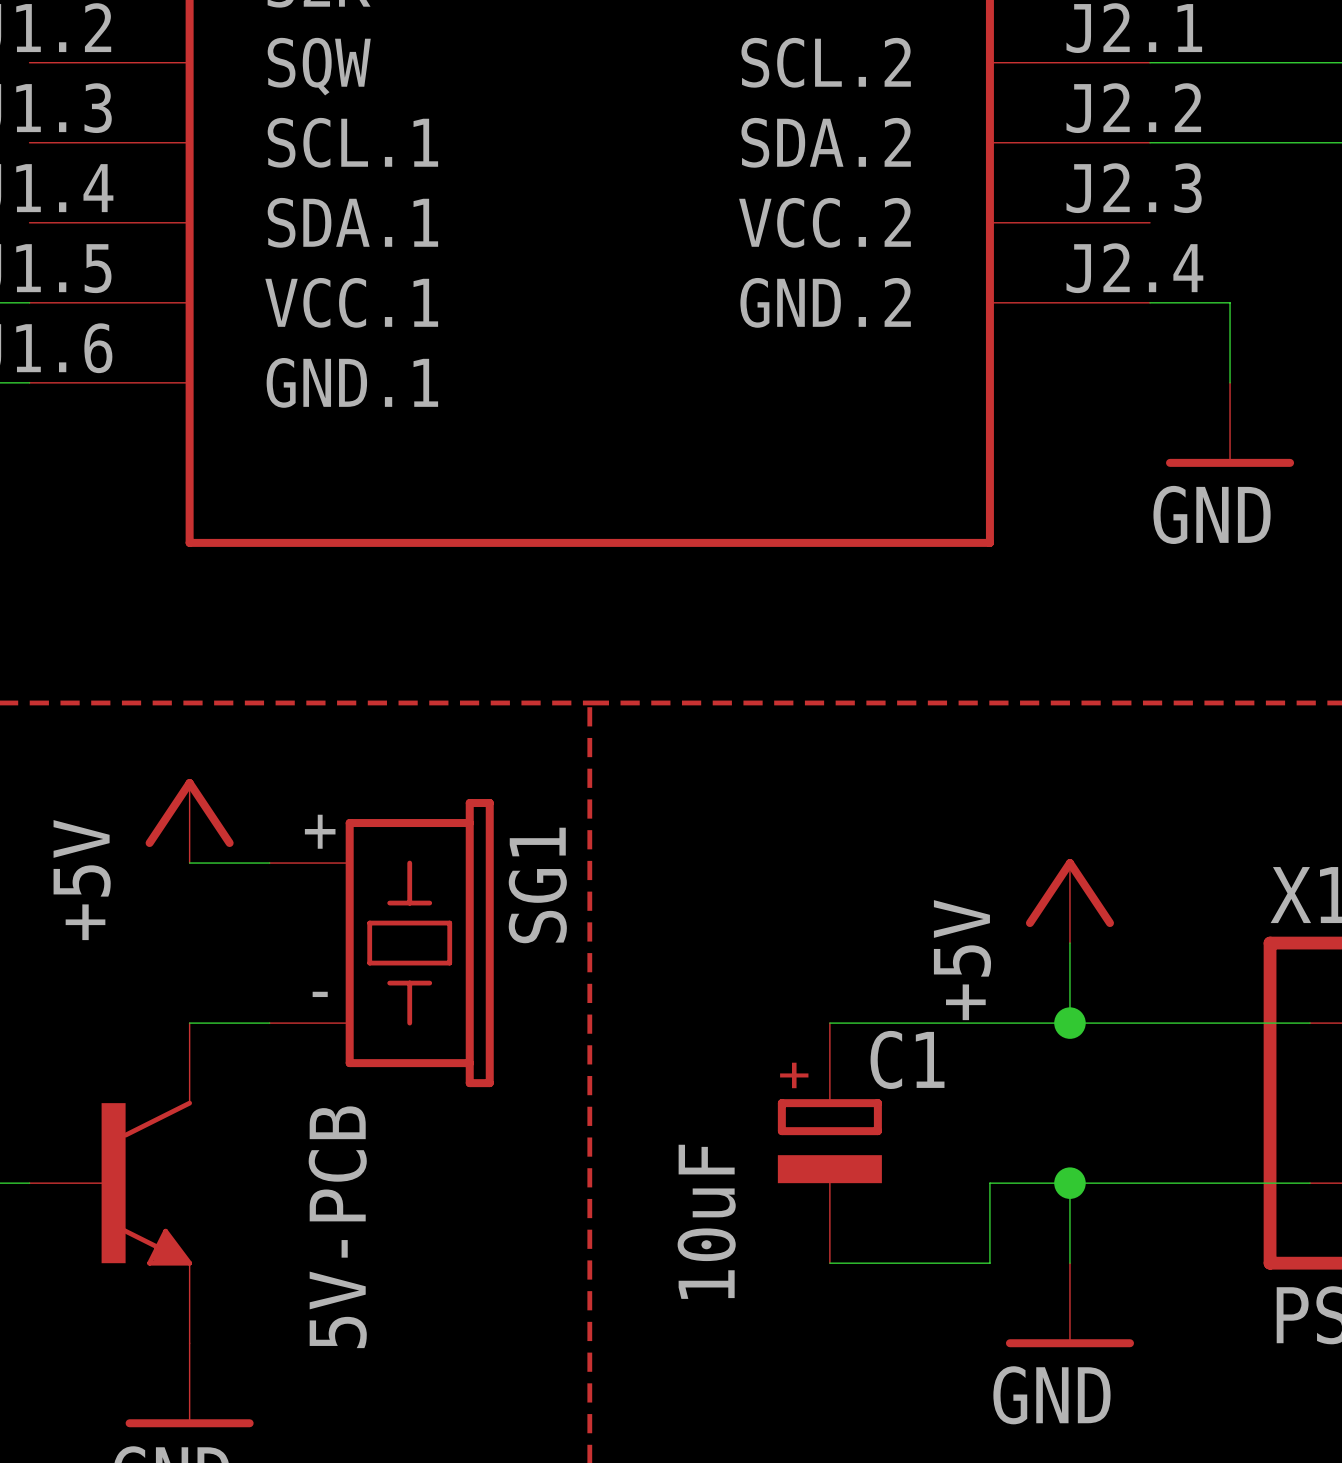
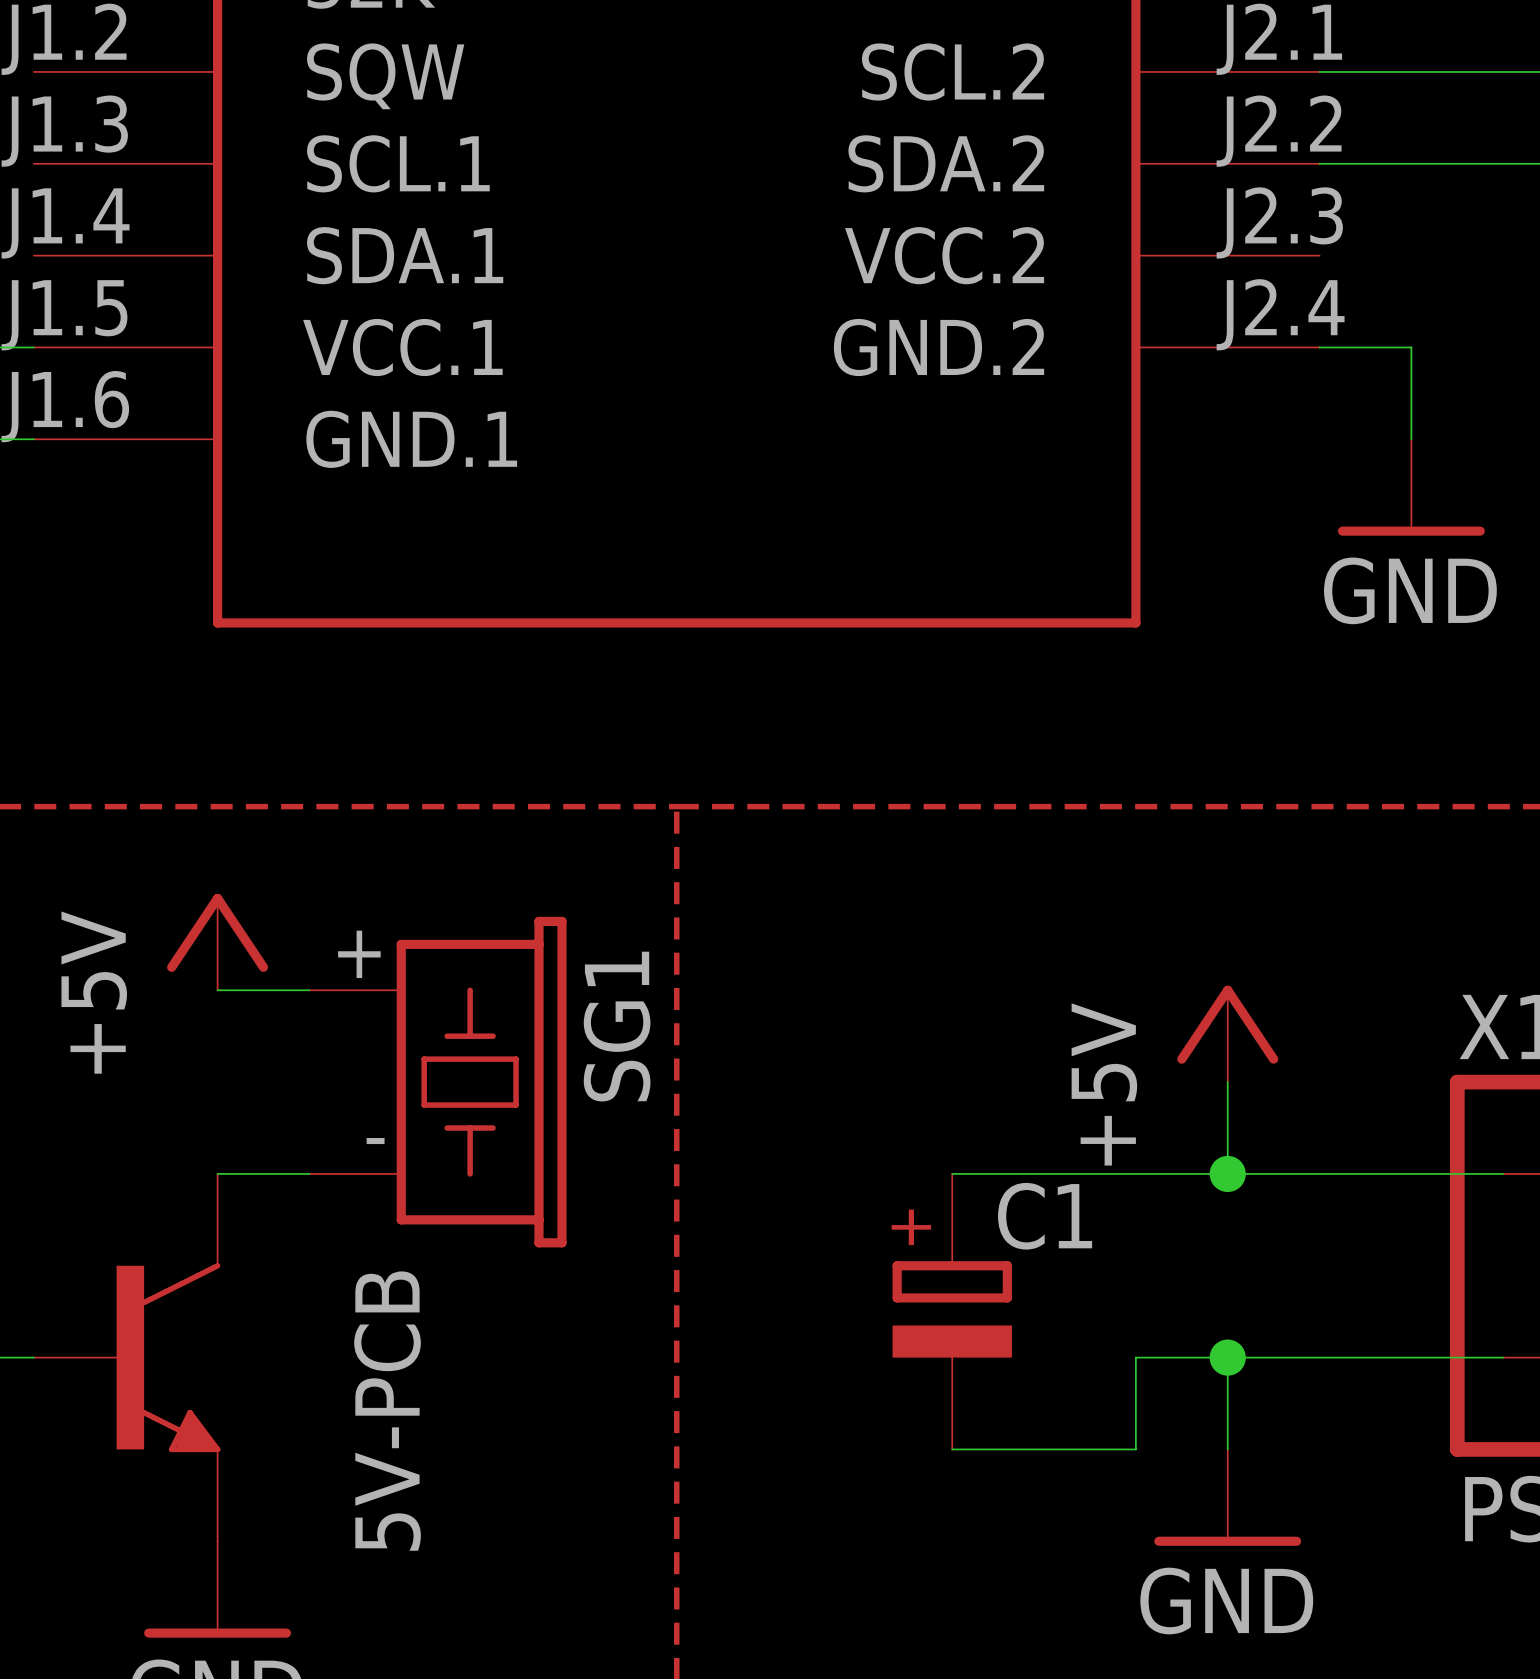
C1 value: 10uF (706, 1221) -> none

